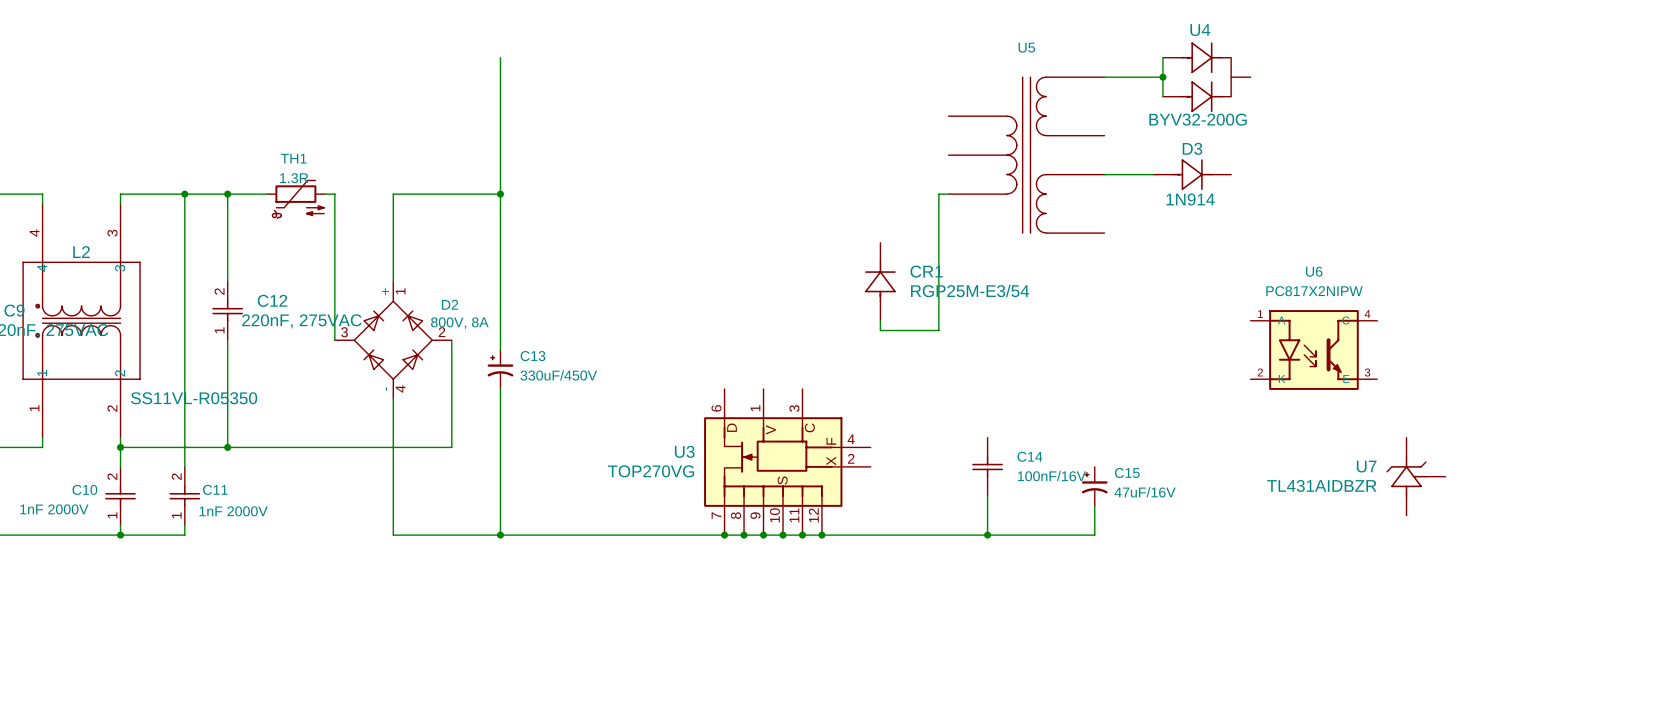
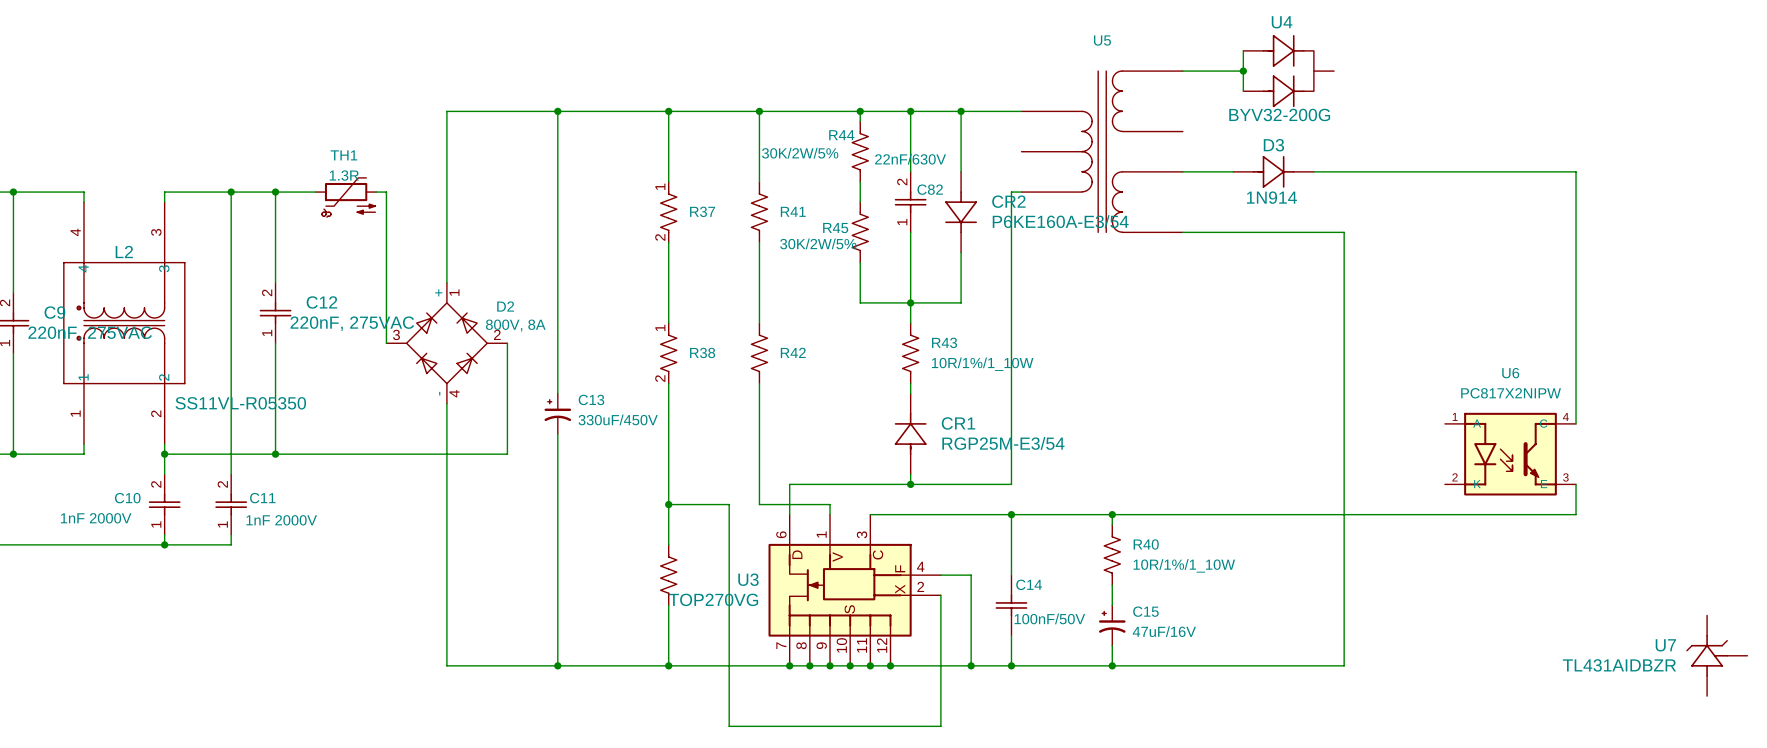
wire: (500, 57) (500, 116) -> none
junction: none -> (557, 111)
wire: none -> (668, 111) (668, 181)
junction: none -> (668, 111)
wire: none -> (759, 111) (759, 181)
junction: none -> (759, 111)
wire: none -> (860, 111) (860, 121)
junction: none -> (860, 111)
wire: none -> (910, 111) (910, 171)
junction: none -> (910, 111)
wire: none -> (961, 111) (961, 171)
junction: none -> (961, 111)
R44: none -> 30K/2W/5% (860, 151)
wire: none -> (1313, 171) (1576, 171) (1576, 423)
wire: none -> (860, 181) (860, 202)
wire: (393, 194) (500, 194) -> (446, 192) (446, 111) (1021, 111)
junction: (500, 194) -> none
C82: none -> 22nF/630V (910, 202)
R37: none -> (668, 212)
R41: none -> (759, 212)
CR2: none -> P6KE160A-E3/54 (961, 212)
R45: none -> 30K/2W/5% (860, 232)
wire: none -> (910, 232) (910, 323)
wire: none -> (668, 242) (668, 323)
wire: none -> (759, 242) (759, 323)
wire: none -> (961, 252) (961, 302) (860, 302) (860, 262)
CR1 position: (880, 281) -> (910, 433)
junction: none -> (910, 302)
wire: (880, 320) (880, 330) (938, 330) -> (789, 514) (789, 484) (1011, 484) (1011, 333)
R38: none -> (668, 353)
R42: none -> (759, 353)
R43: none -> 10R/1%/1_10W (910, 353)
U6 position: (1313, 349) -> (1510, 454)
C13 position: (500, 369) -> (557, 413)
wire: none -> (668, 383) (668, 544)
wire: none -> (759, 383) (759, 504) (830, 504) (830, 514)
wire: none -> (910, 383) (910, 393)
C14 name position: C14 (1029, 456) -> C14 (1029, 584)
U3 position: (787, 462) -> (854, 590)
C14 position: (987, 466) -> (1011, 605)
junction: none -> (910, 484)
C14 value: 100nF/16V (1051, 476) -> 100nF/50V (1049, 618)
U7 position: (1416, 476) -> (1717, 655)
wire: none -> (1576, 484) (1576, 514) (870, 514)
C15 position: (1094, 486) -> (1112, 625)
wire: none -> (668, 504) (729, 504) (729, 726) (940, 726) (940, 595)
junction: none -> (668, 504)
wire: (987, 496) (987, 535) -> none
wire: none -> (1011, 514) (1011, 575)
junction: none -> (1011, 514)
wire: none -> (1112, 514) (1112, 524)
junction: none -> (1112, 514)
wire: (1094, 505) (1094, 535) (393, 535) -> (1182, 232) (1344, 232) (1344, 665) (446, 665) (446, 544)
wire: none -> (557, 544) (557, 665)
junction: (500, 535) -> none
junction: (724, 535) -> none
junction: (744, 535) -> none
junction: (763, 535) -> none
junction: (782, 535) -> none
junction: (802, 535) -> none
junction: (821, 535) -> none
junction: (987, 535) -> none
R40: none -> 10R/1%/1_10W (1112, 554)
part: none -> (668, 575)
wire: none -> (940, 575) (971, 575) (971, 665)
wire: none -> (1112, 585) (1112, 605)
wire: none -> (668, 605) (668, 665)
wire: none -> (1011, 635) (1011, 665)
wire: none -> (1112, 645) (1112, 665)
junction: none -> (557, 665)
junction: none -> (668, 665)
junction: none -> (789, 665)
junction: none -> (809, 665)
junction: none -> (830, 665)
junction: none -> (850, 665)
junction: none -> (870, 665)
junction: none -> (890, 665)
junction: none -> (971, 665)
junction: none -> (1011, 665)
junction: none -> (1112, 665)

